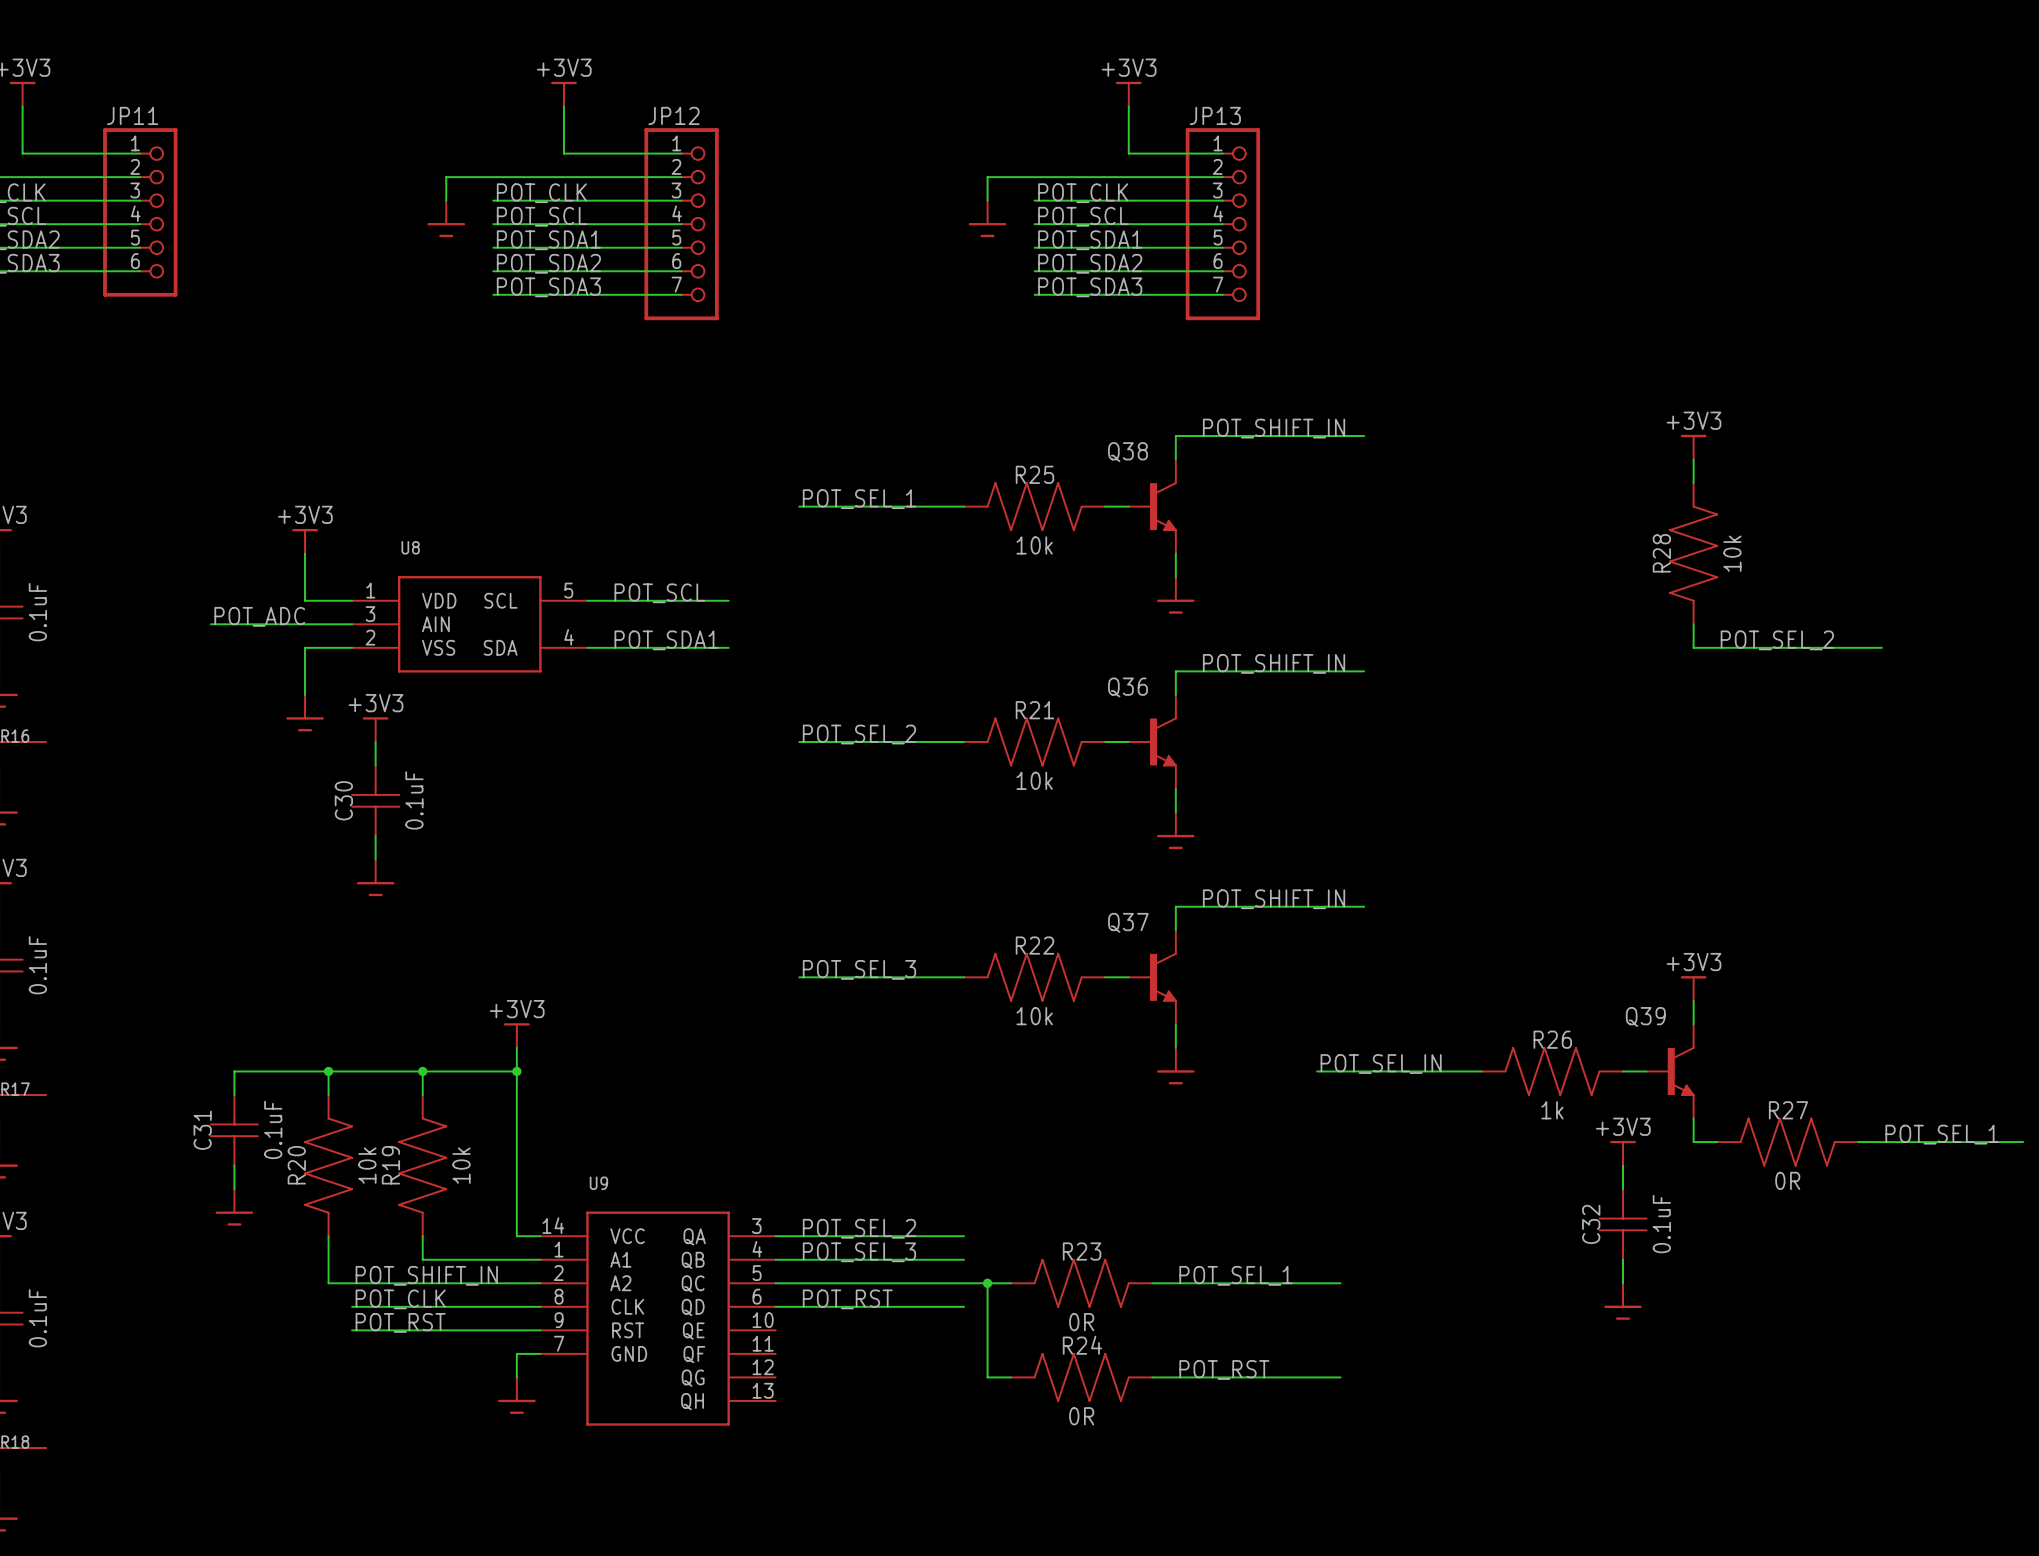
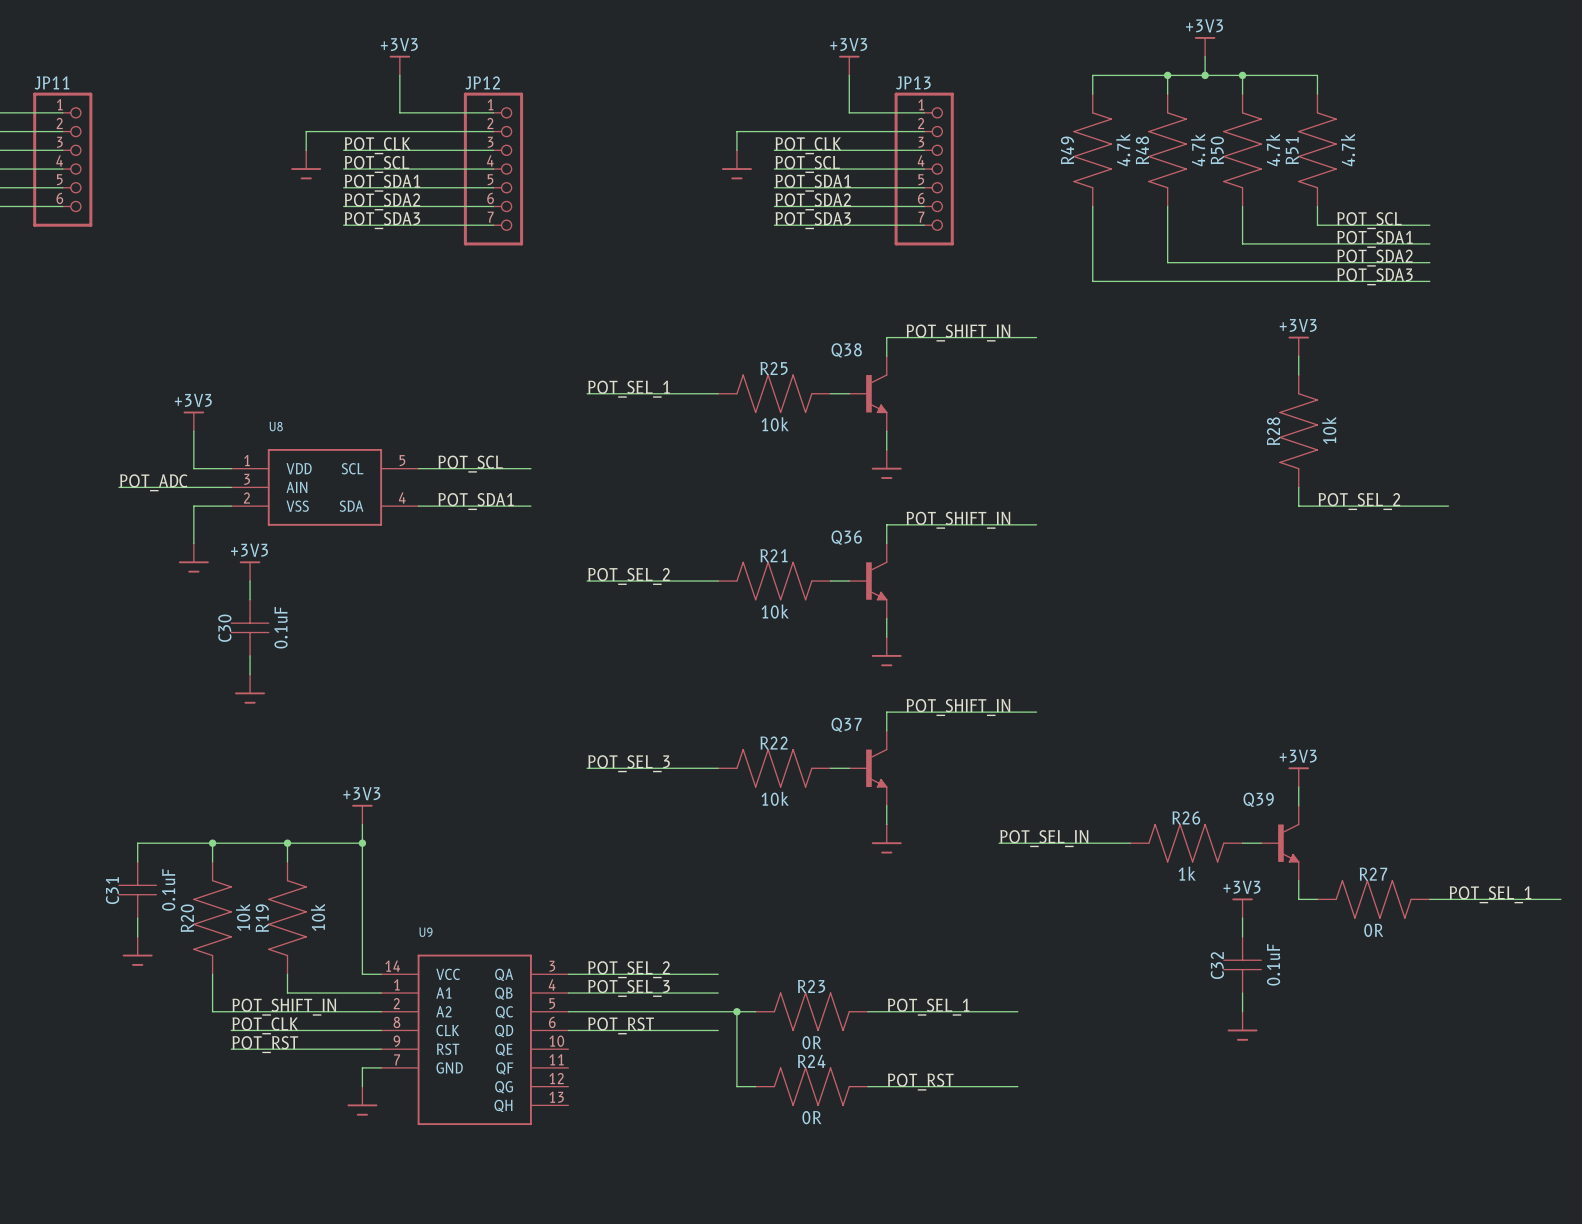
power symbol: none -> +3V3 (1205, 46)
wire: none -> (1205, 56) (1205, 75)
wire: none -> (1167, 75) (1167, 94)
junction: none -> (1167, 75)
junction: none -> (1205, 75)
wire: none -> (1242, 75) (1242, 94)
junction: none -> (1242, 75)
wire: none -> (1092, 94) (1092, 75) (1317, 75) (1317, 94)
R49: none -> 4.7k (1092, 150)
R48: none -> 4.7k (1167, 150)
R50: none -> 4.7k (1242, 150)
R51: none -> 4.7k (1317, 150)
wire: none -> (1092, 206) (1092, 281) (1429, 281)
wire: none -> (1167, 206) (1167, 262) (1429, 262)
wire: none -> (1242, 206) (1242, 243) (1429, 243)
wire: none -> (1317, 206) (1317, 225) (1429, 225)
label: none -> POT_SCL (1369, 220)
label: none -> POT_SDA1 (1375, 239)
label: none -> POT_SDA2 (1375, 258)
label: none -> POT_SDA3 (1375, 276)

